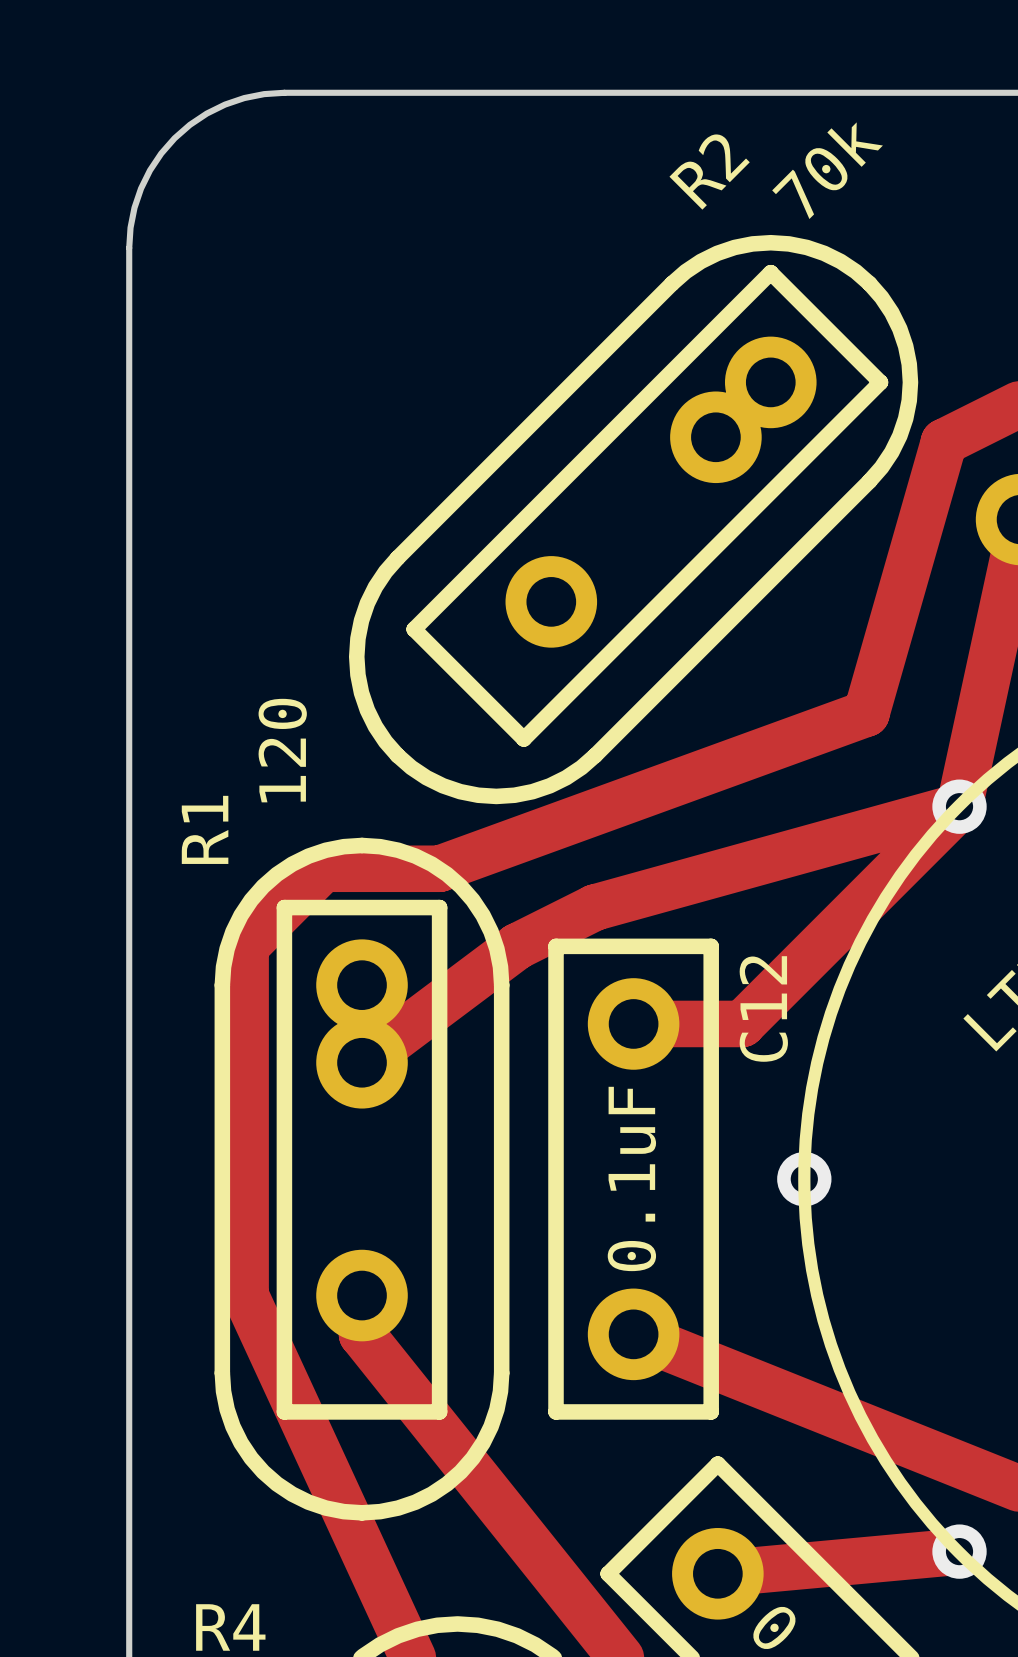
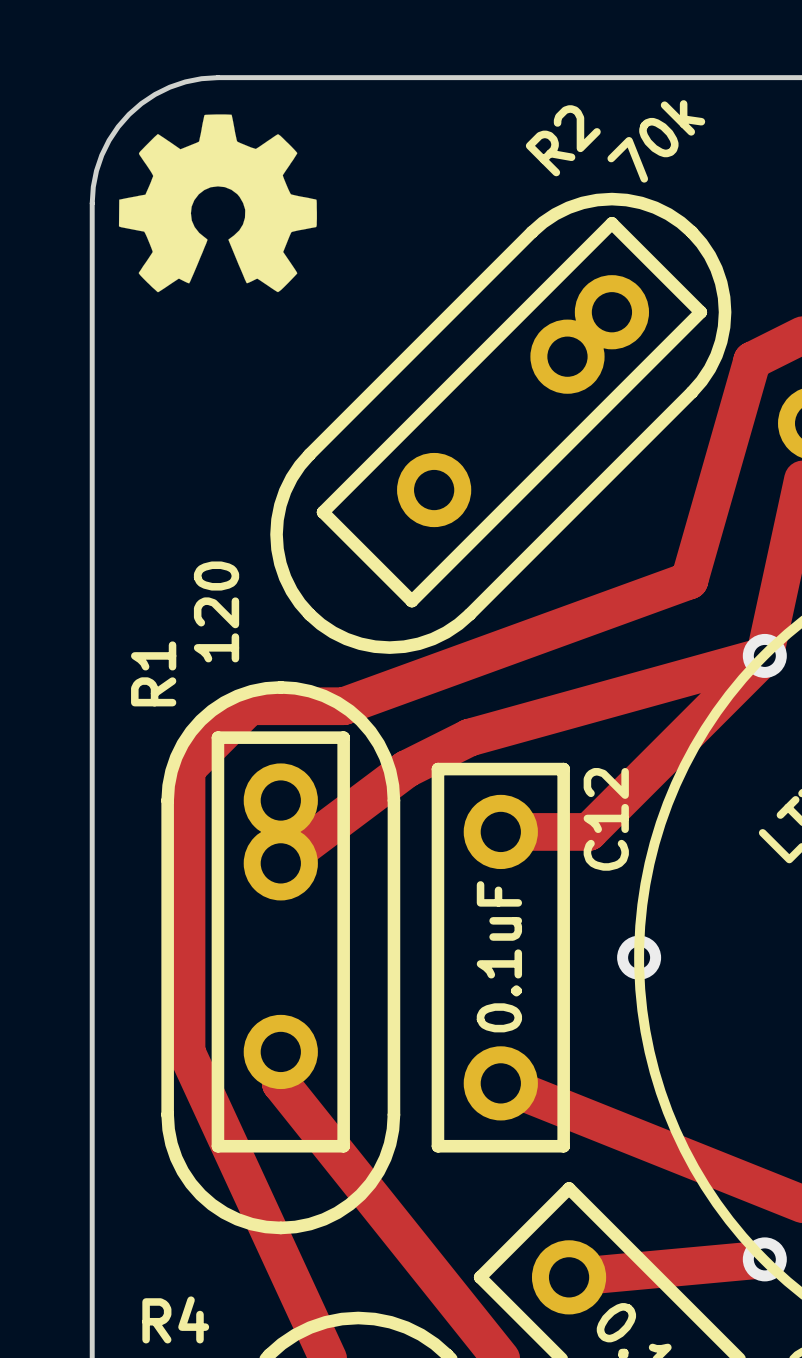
drawing: none -> [118, 114, 317, 293]

